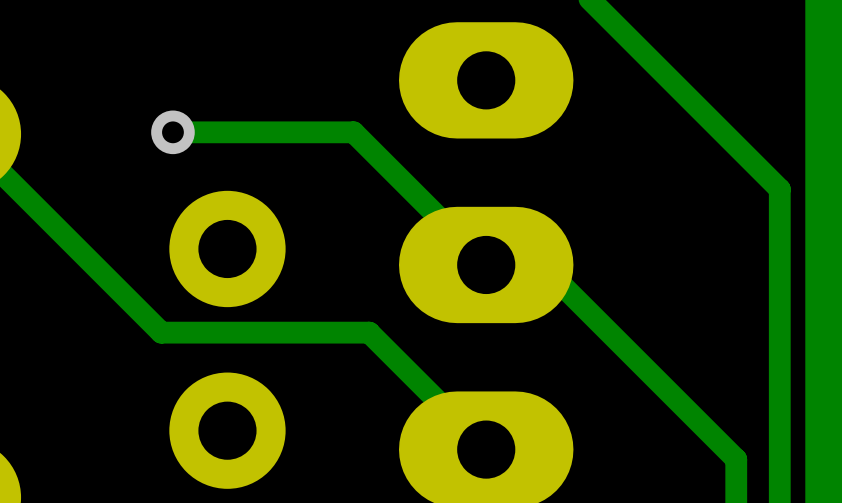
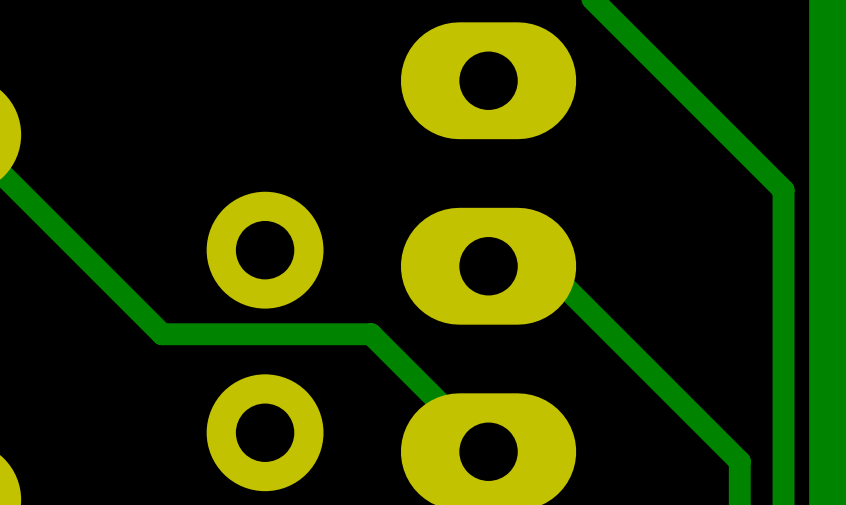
track: (172, 132) (353, 132) (486, 264) -> none
via: (172, 132) -> none
part position: (227, 339) -> (265, 341)

